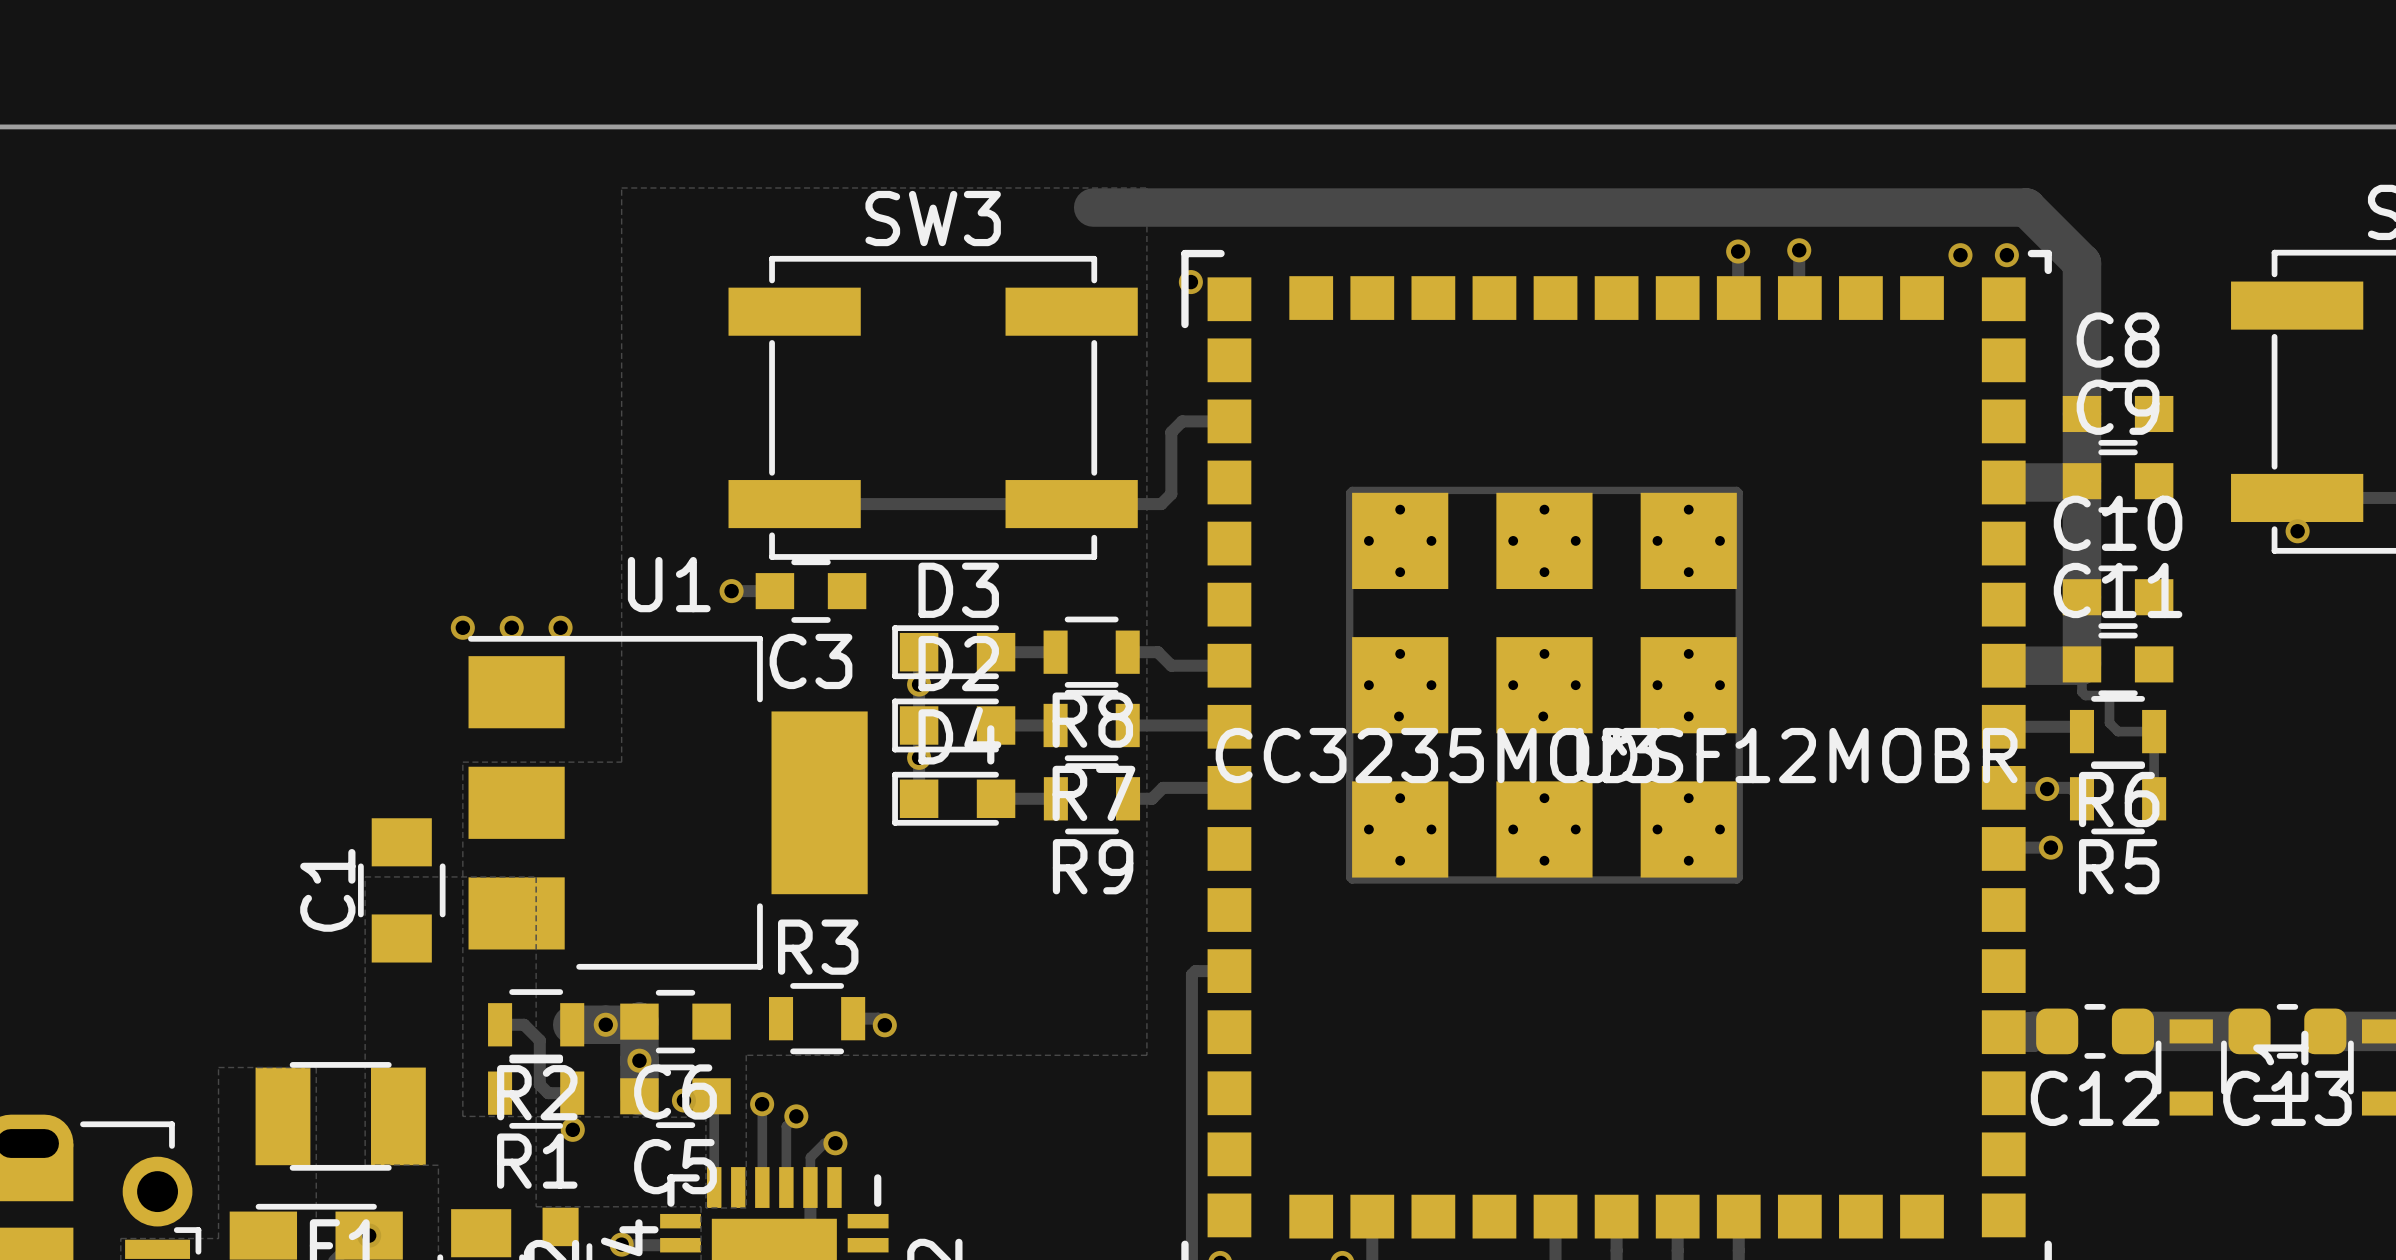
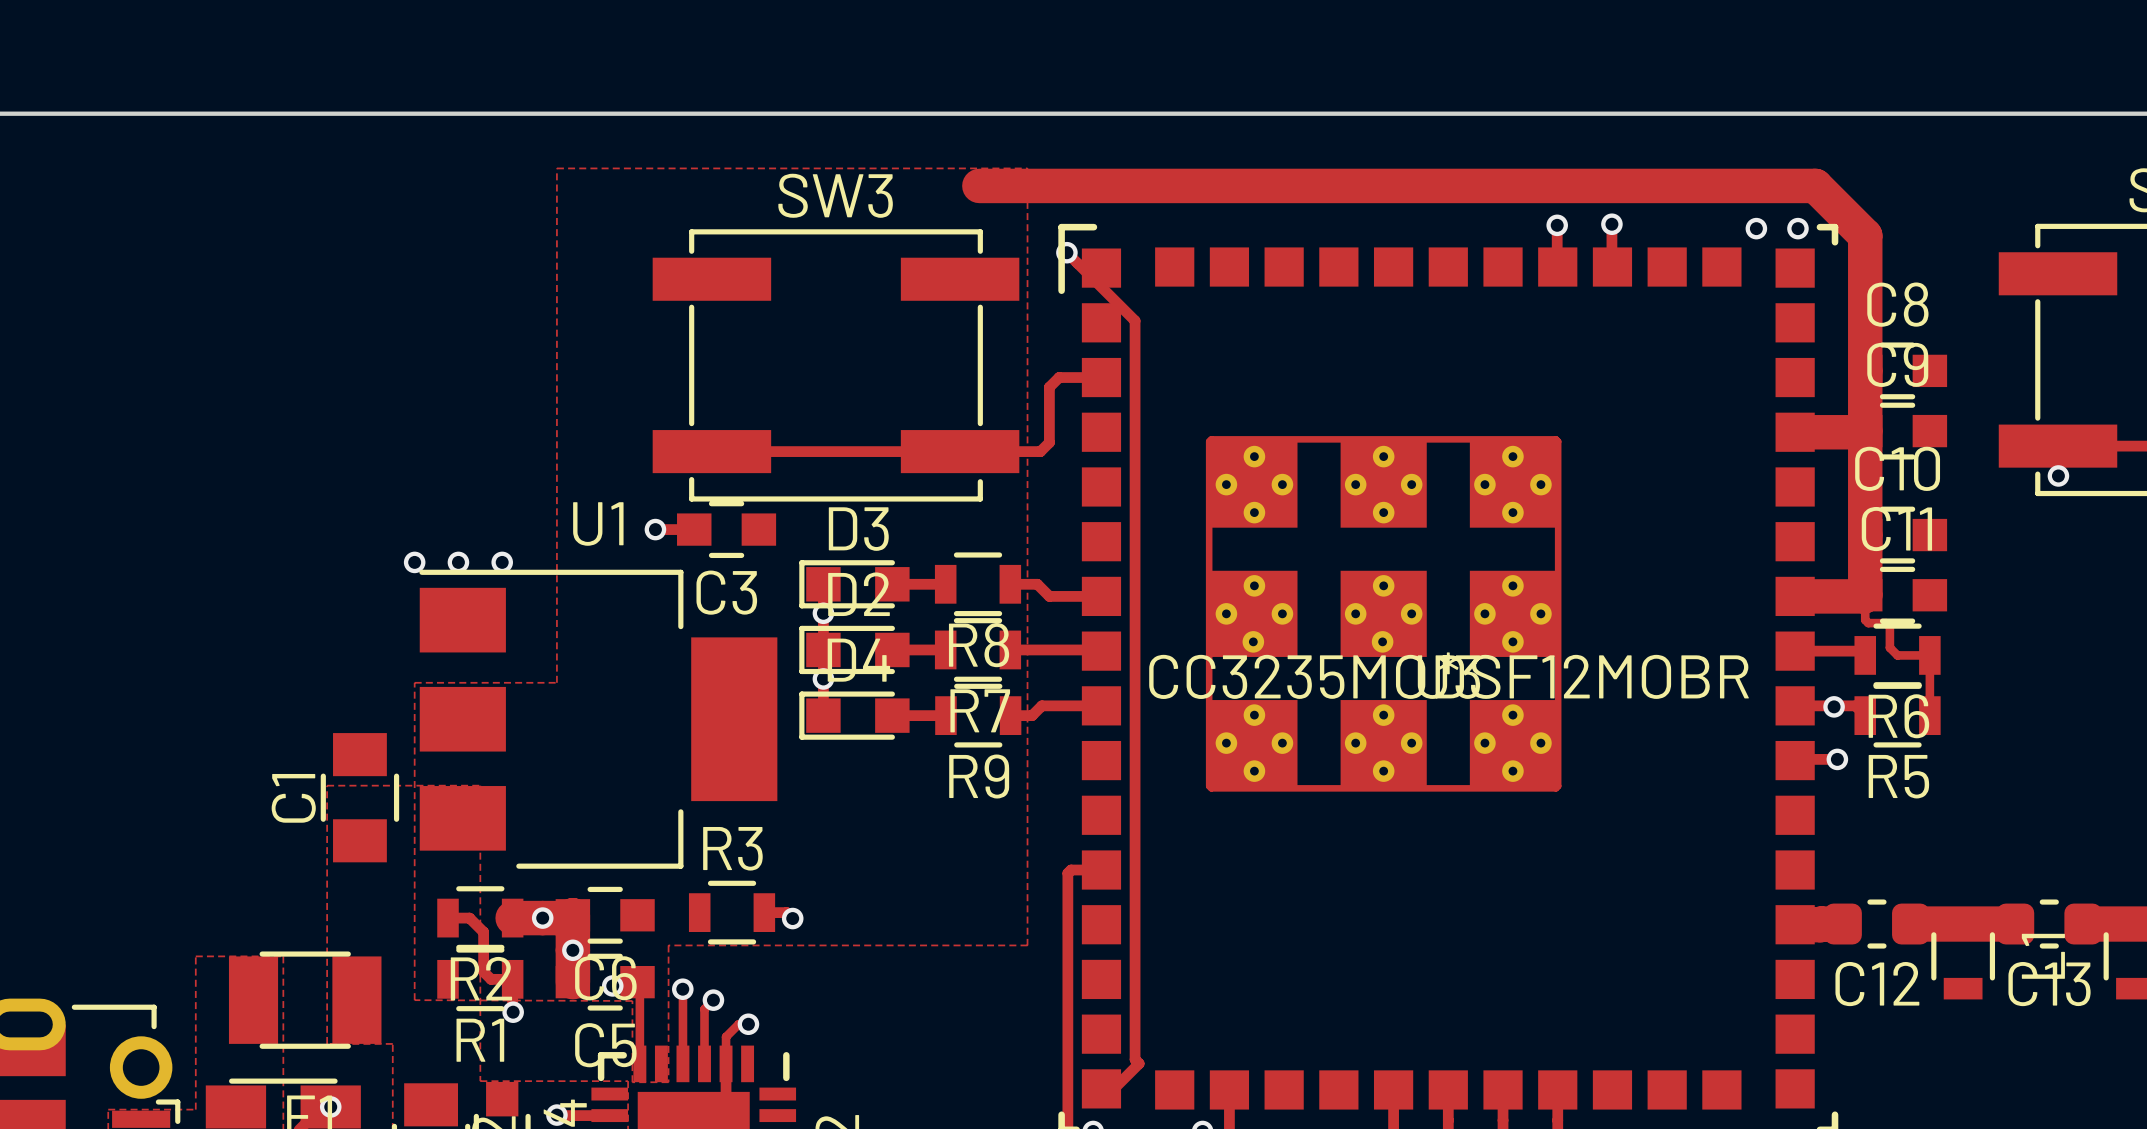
track: none -> (1066, 252) (1135, 320) (1135, 1059) (1139, 1063) (1113, 1088) (1101, 1088)

